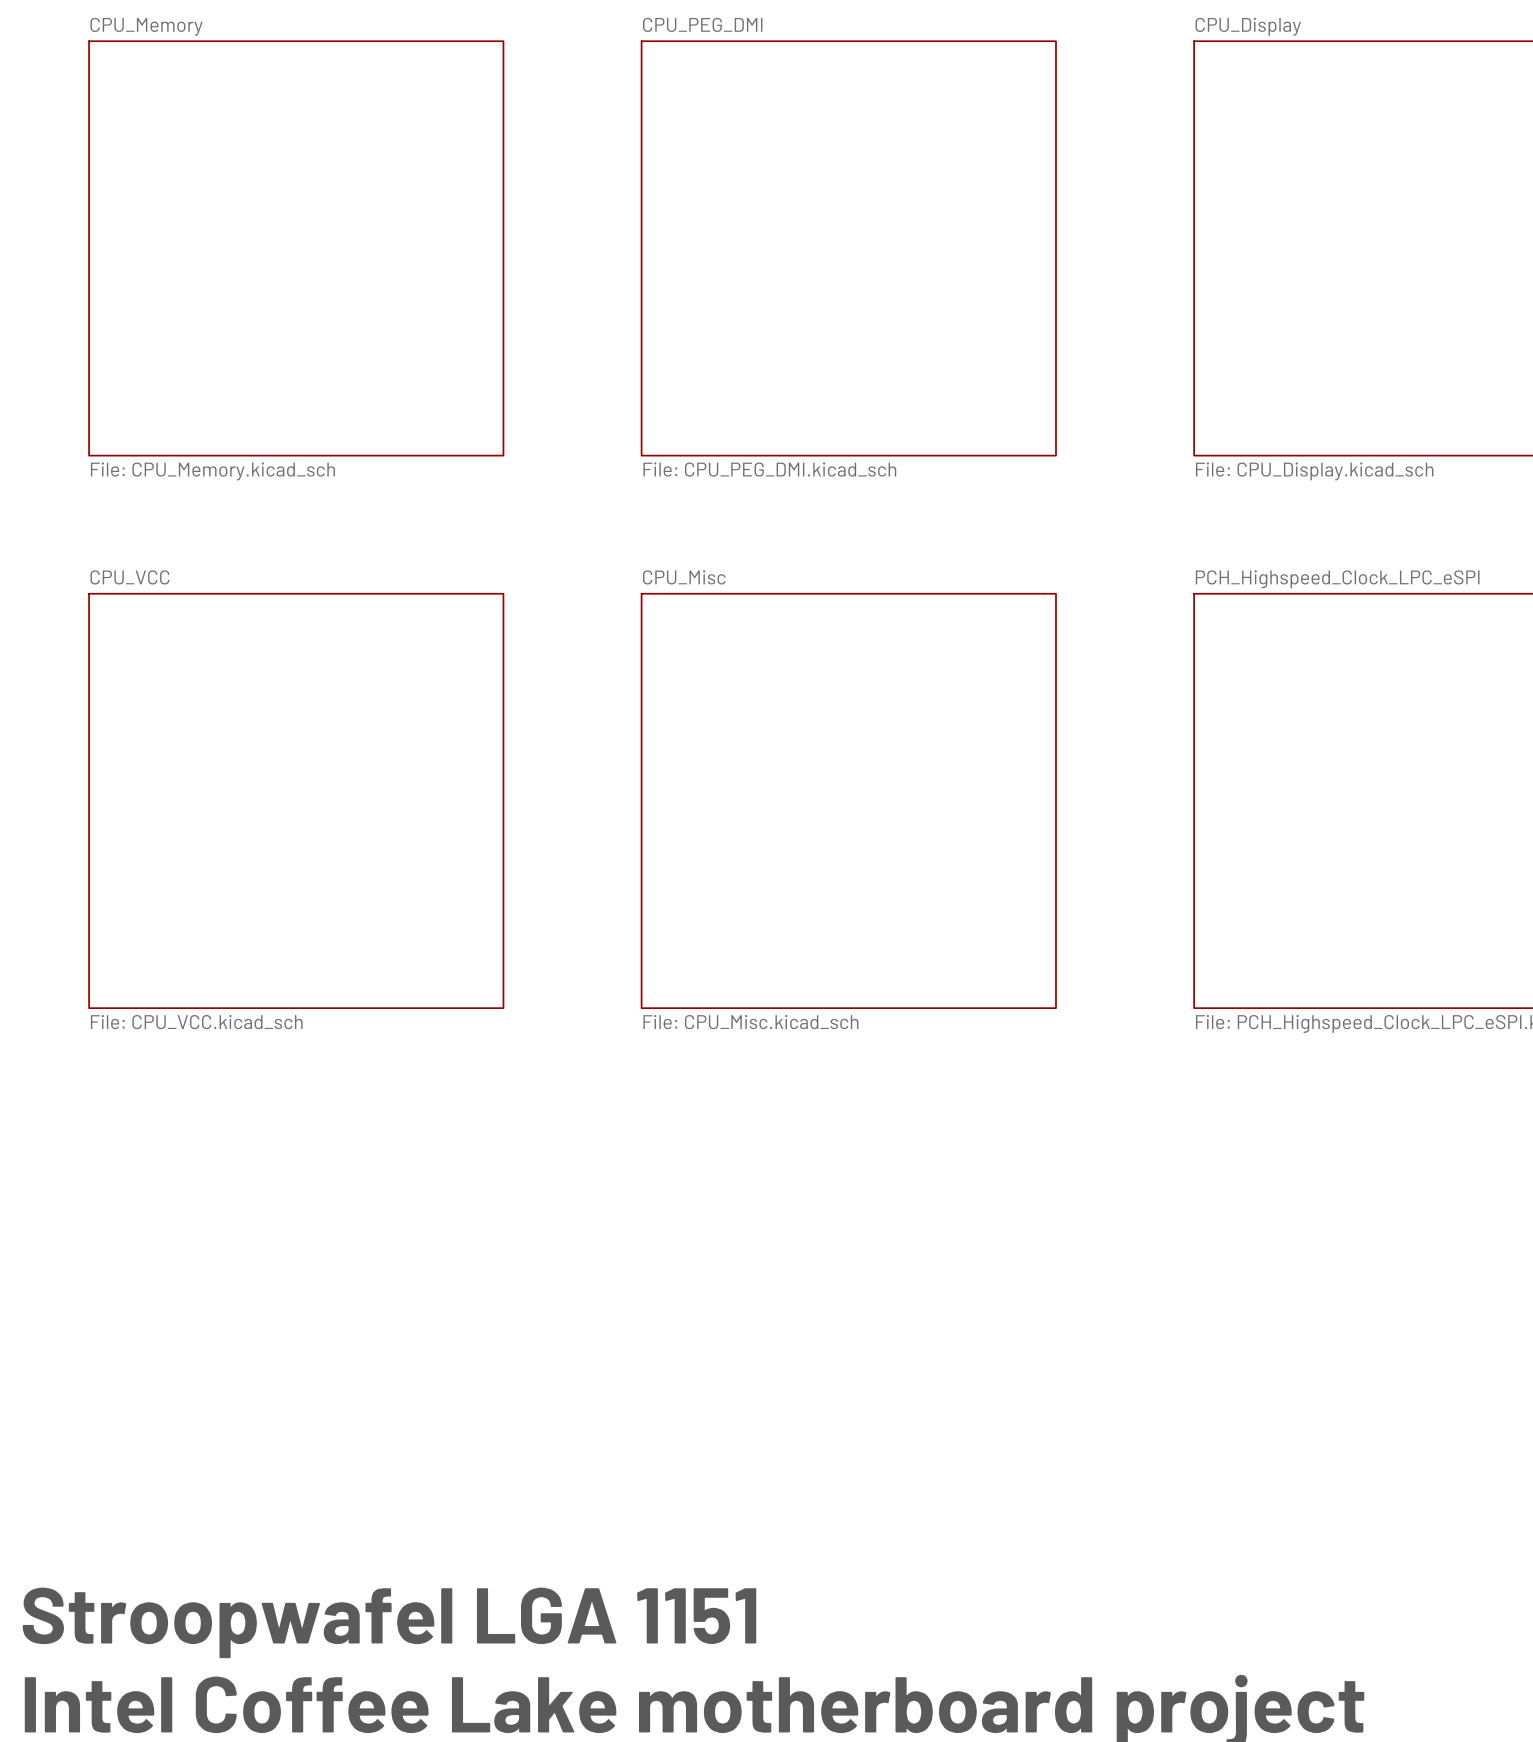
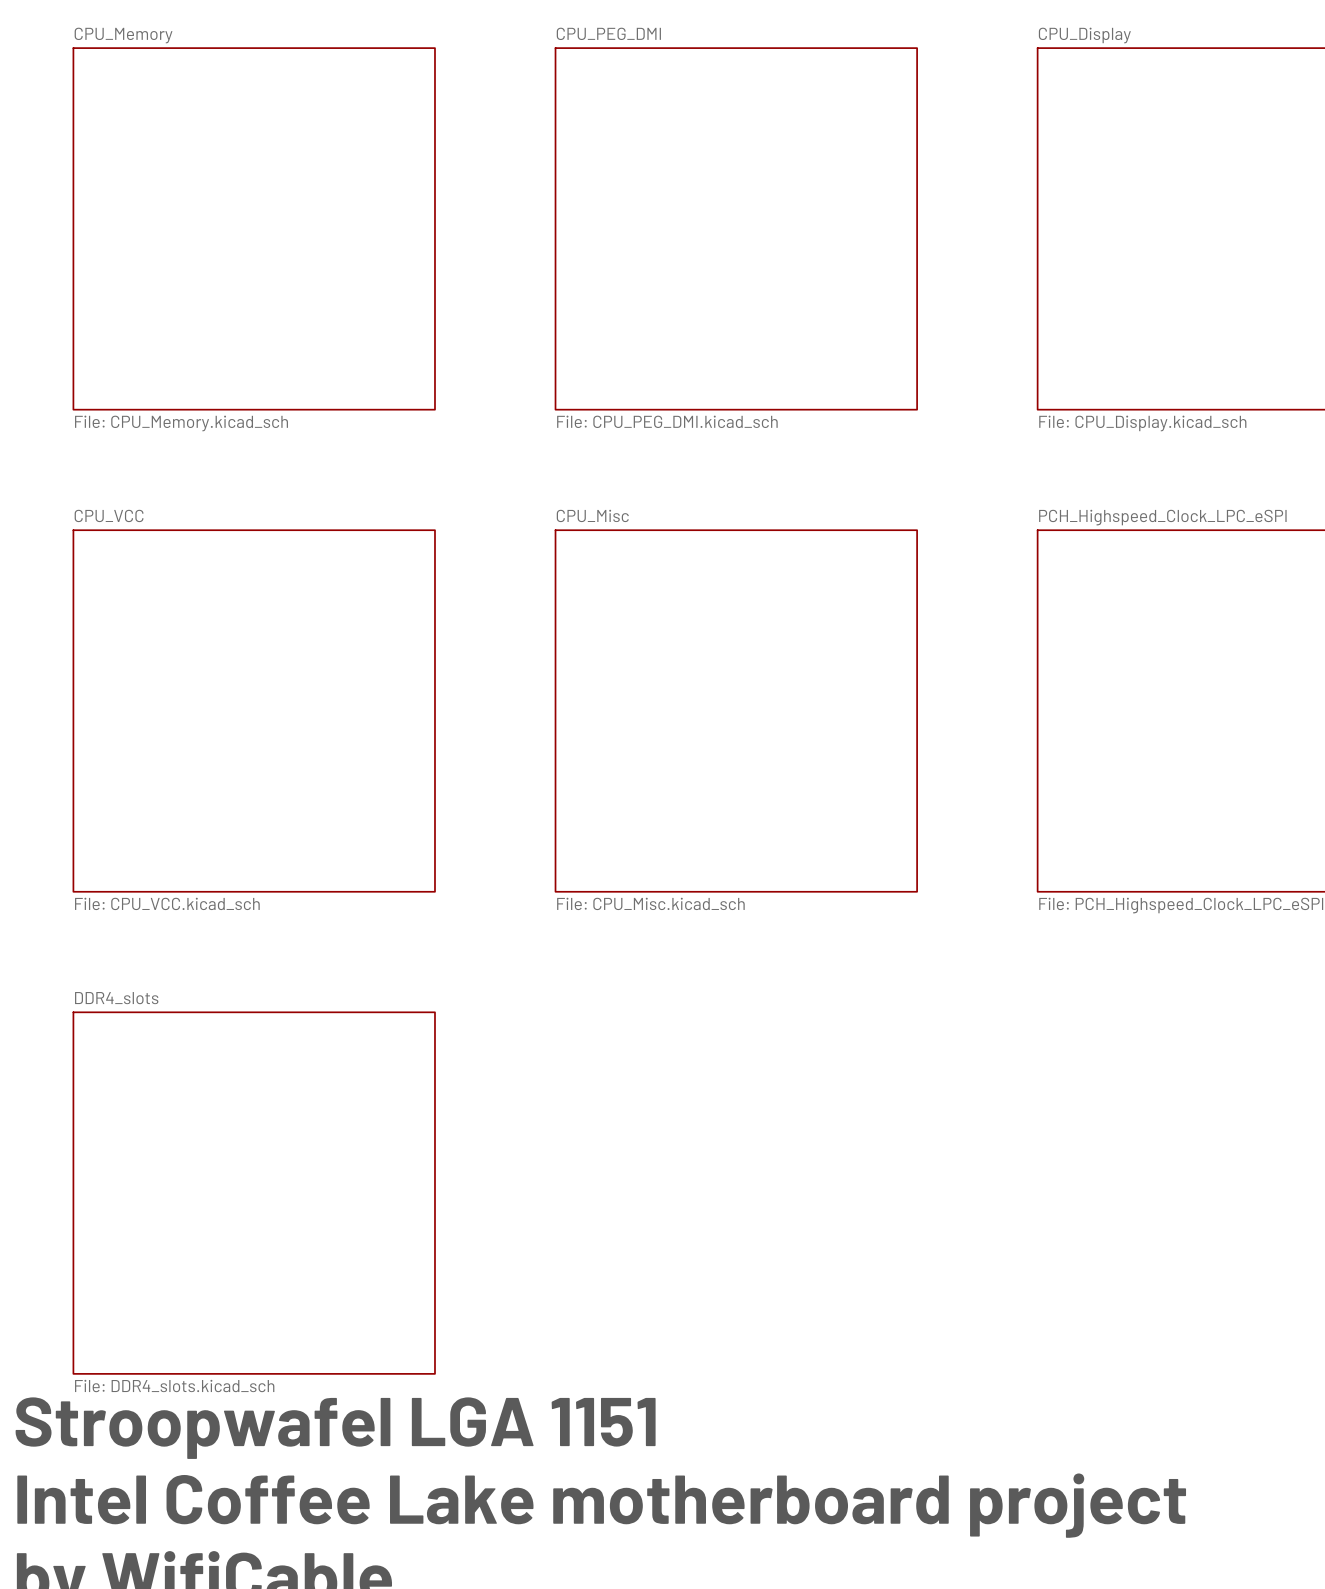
sheet DDR4_slots: none -> File: DDR4_slots.kicad_sch (254, 1193)

